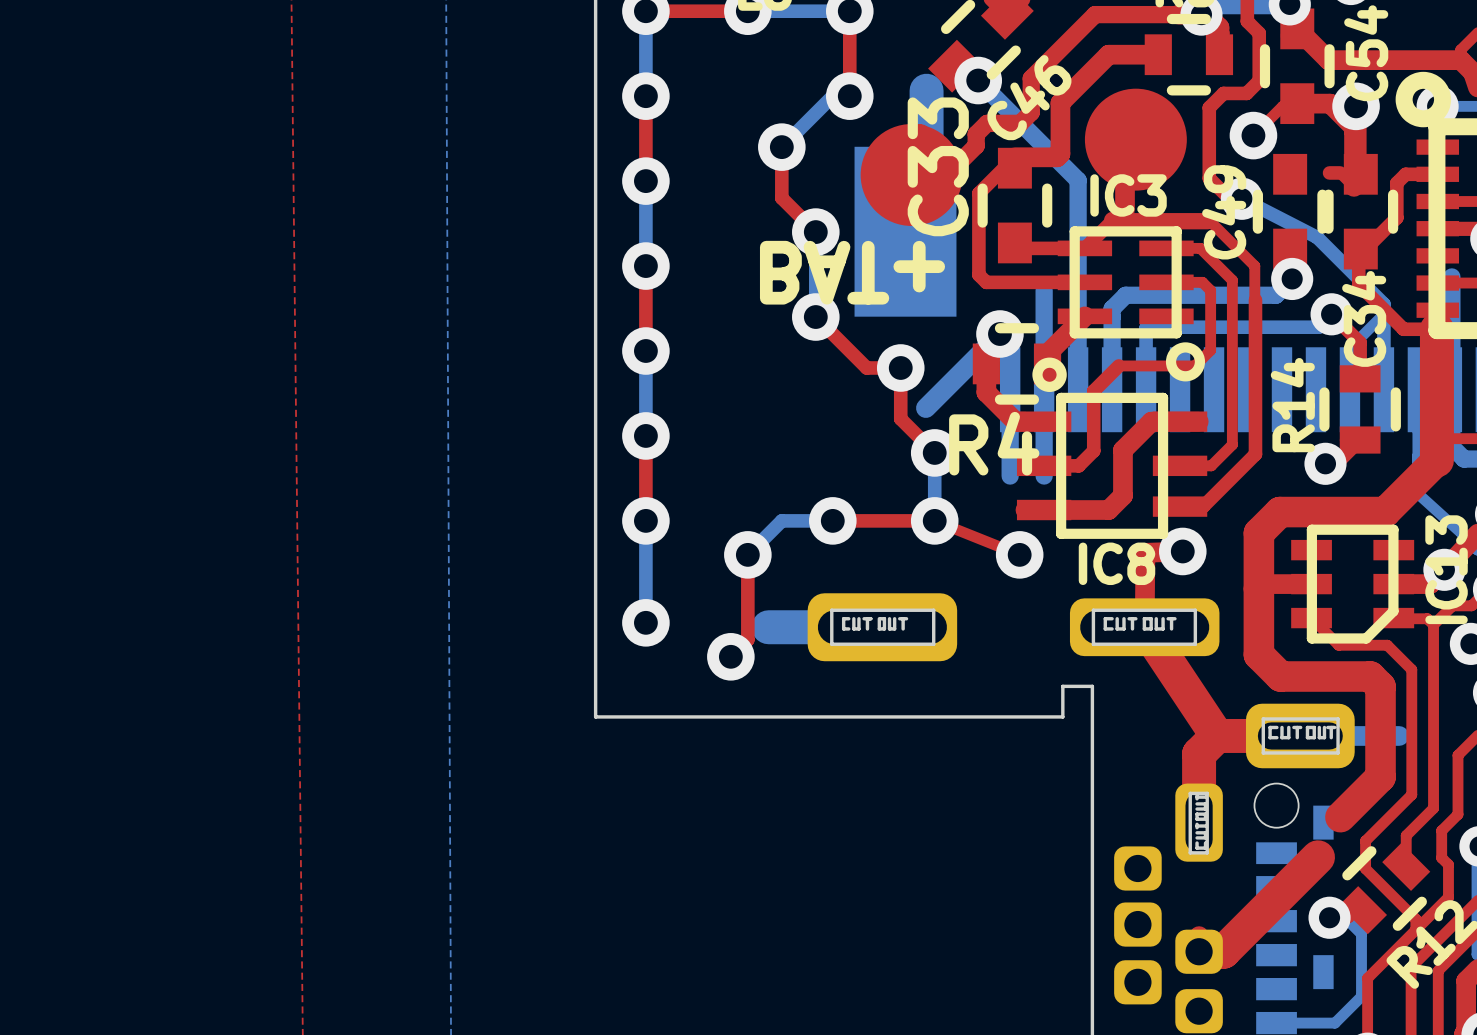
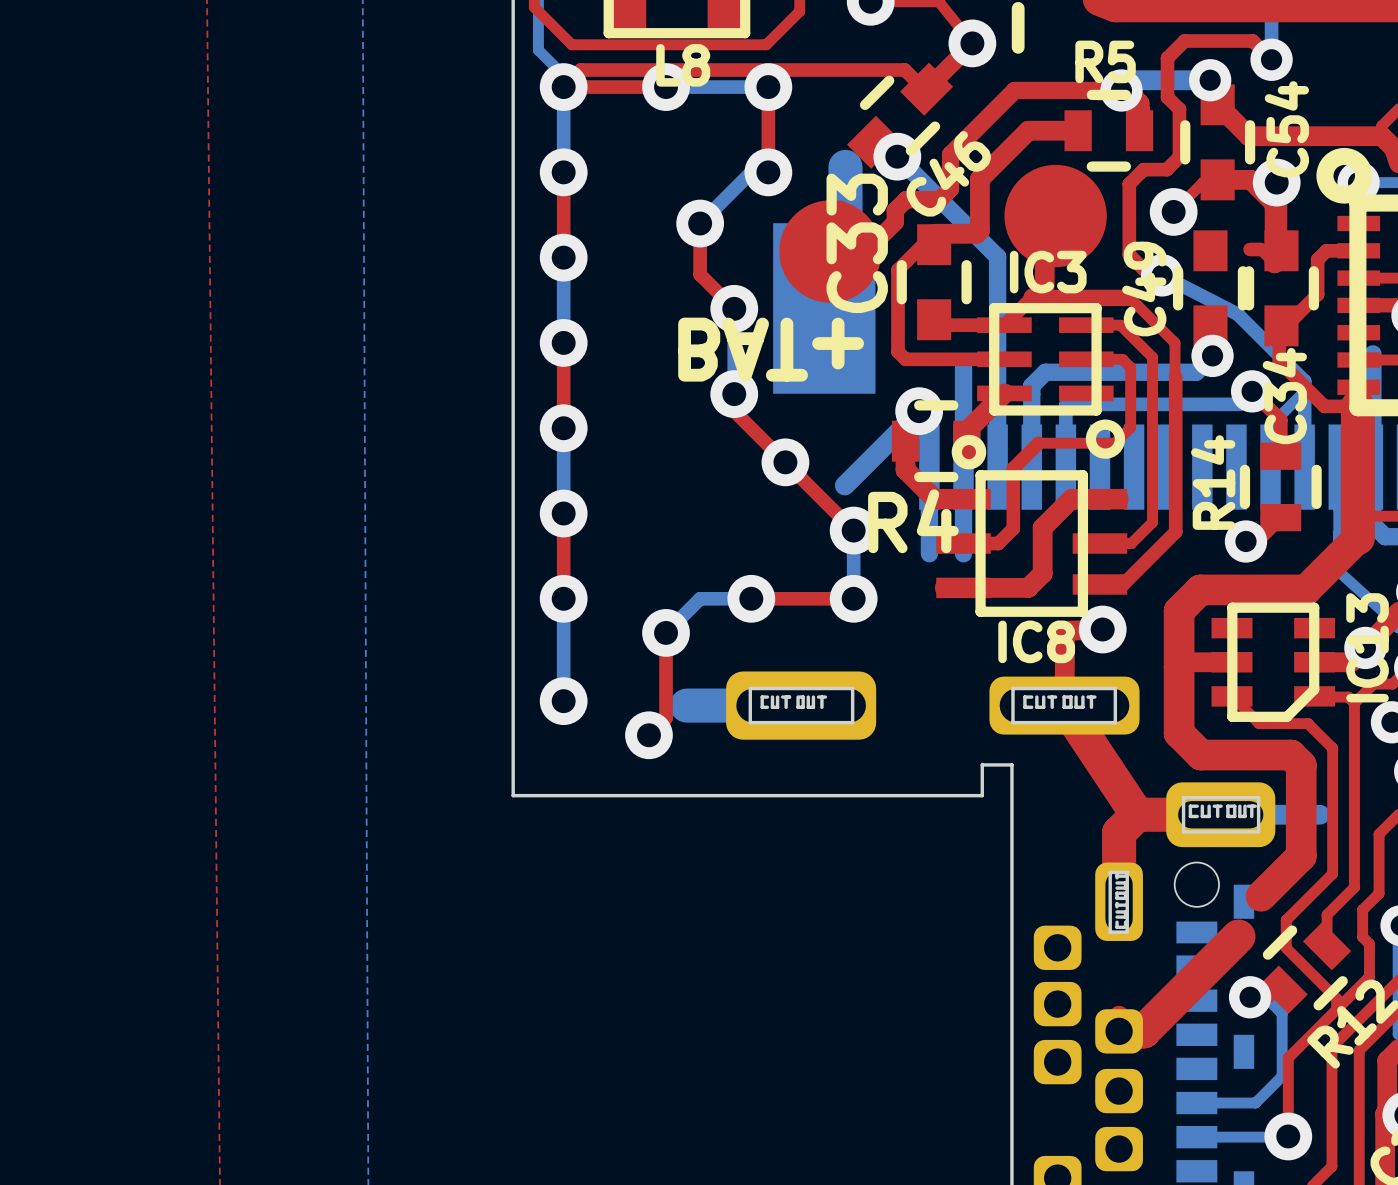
top track: (815, 317) (866, 367) (900, 367) (900, 418) -> (734, 394) (734, 411) (819, 496)
via position: (900, 367) -> (785, 462)
top track: (934, 520) (1019, 554) -> none
via: (1019, 554) -> none

